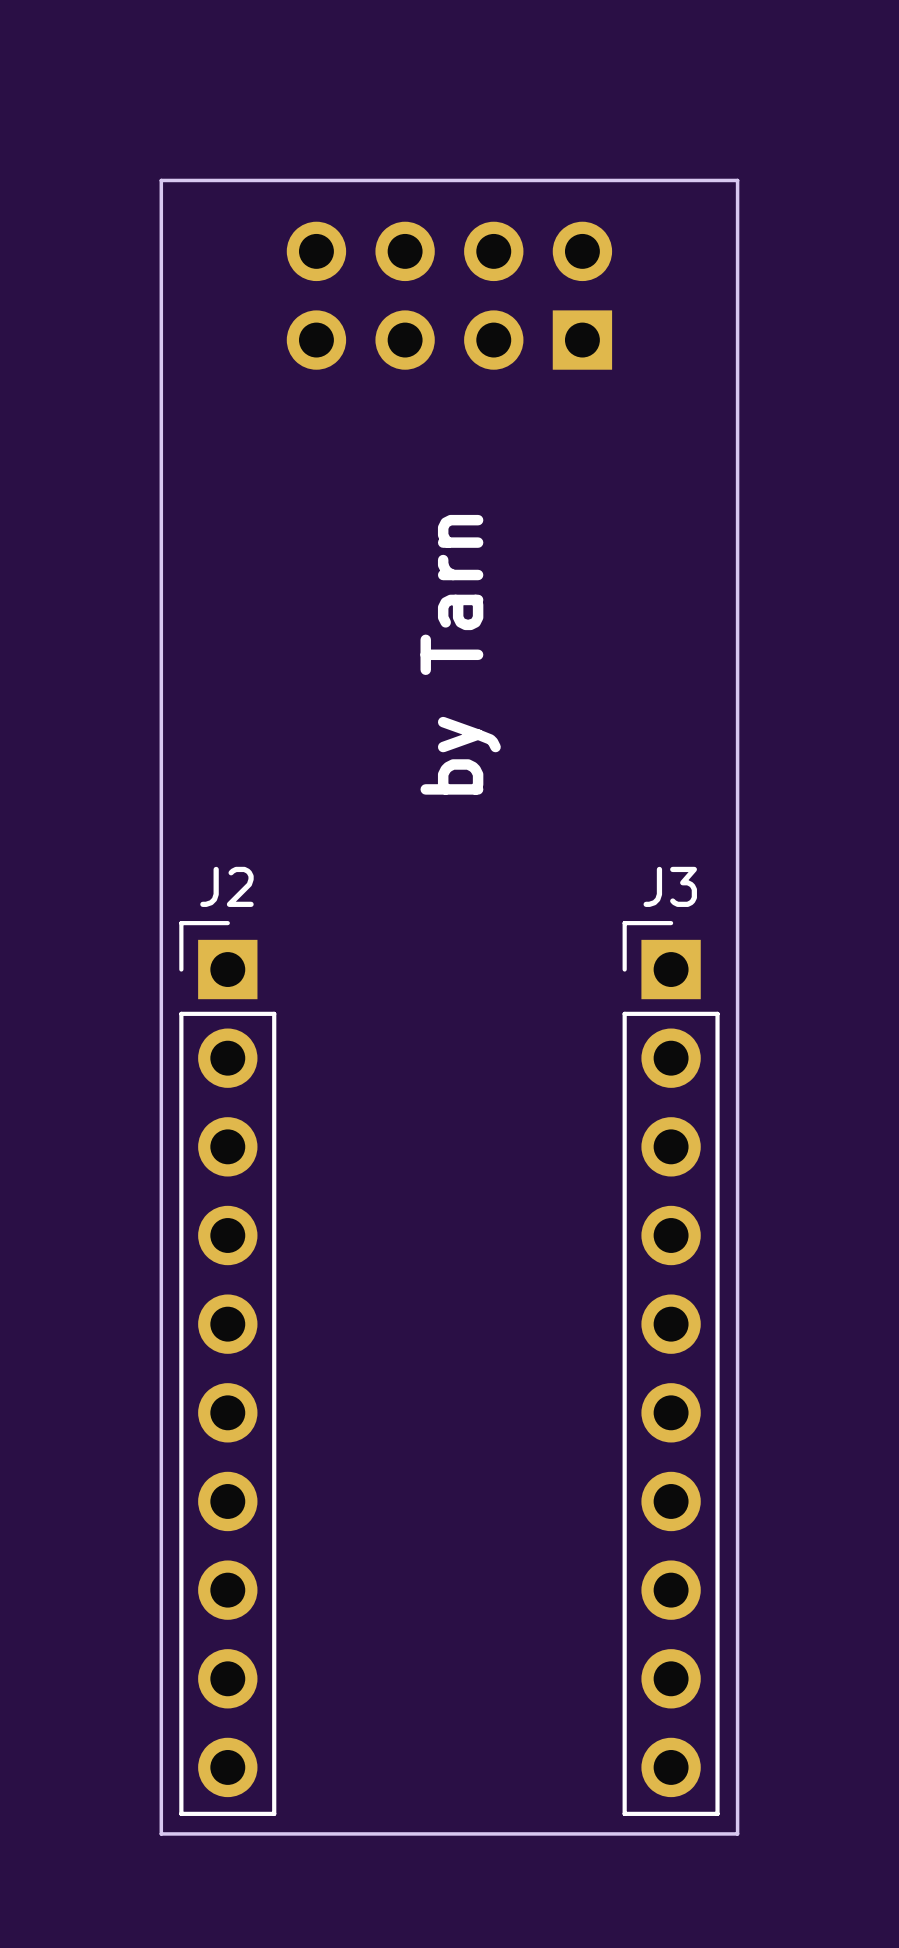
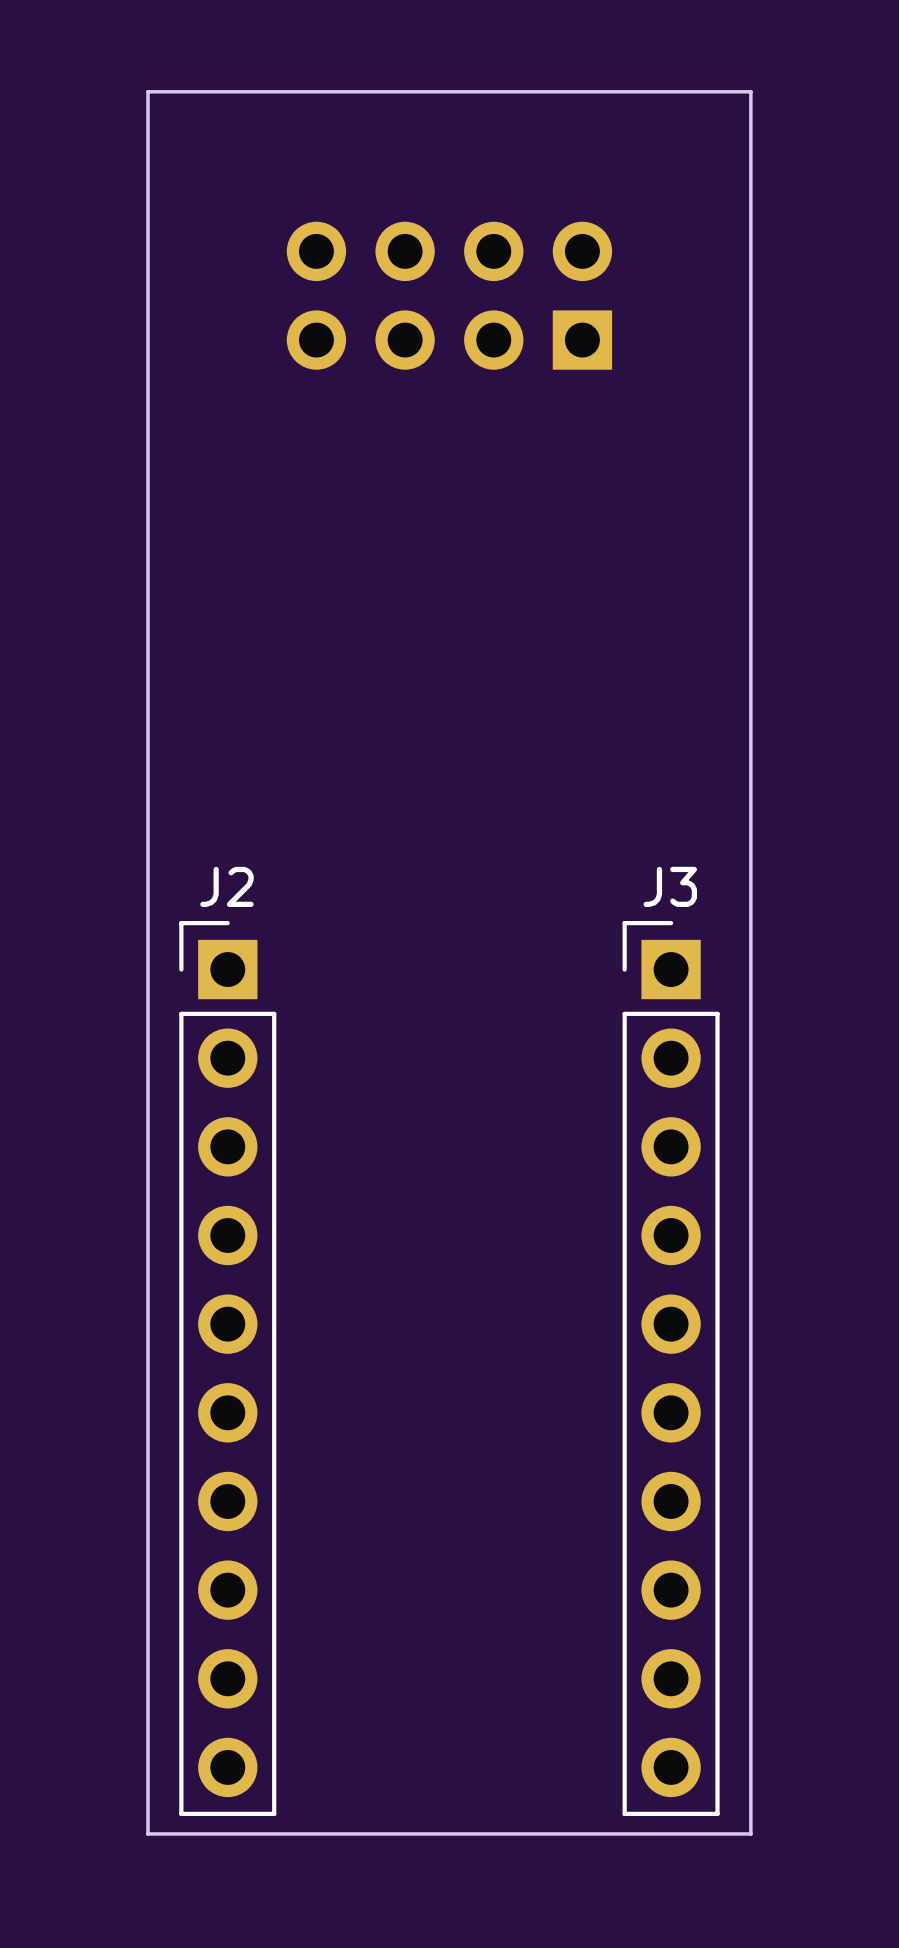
text: by Tarn (460, 654) -> none
board edge: (737, 1833) (737, 180) (161, 180) (161, 1833) -> (737, 1833) (750, 1833) (750, 91) (148, 91) (148, 1833) (161, 1833)

